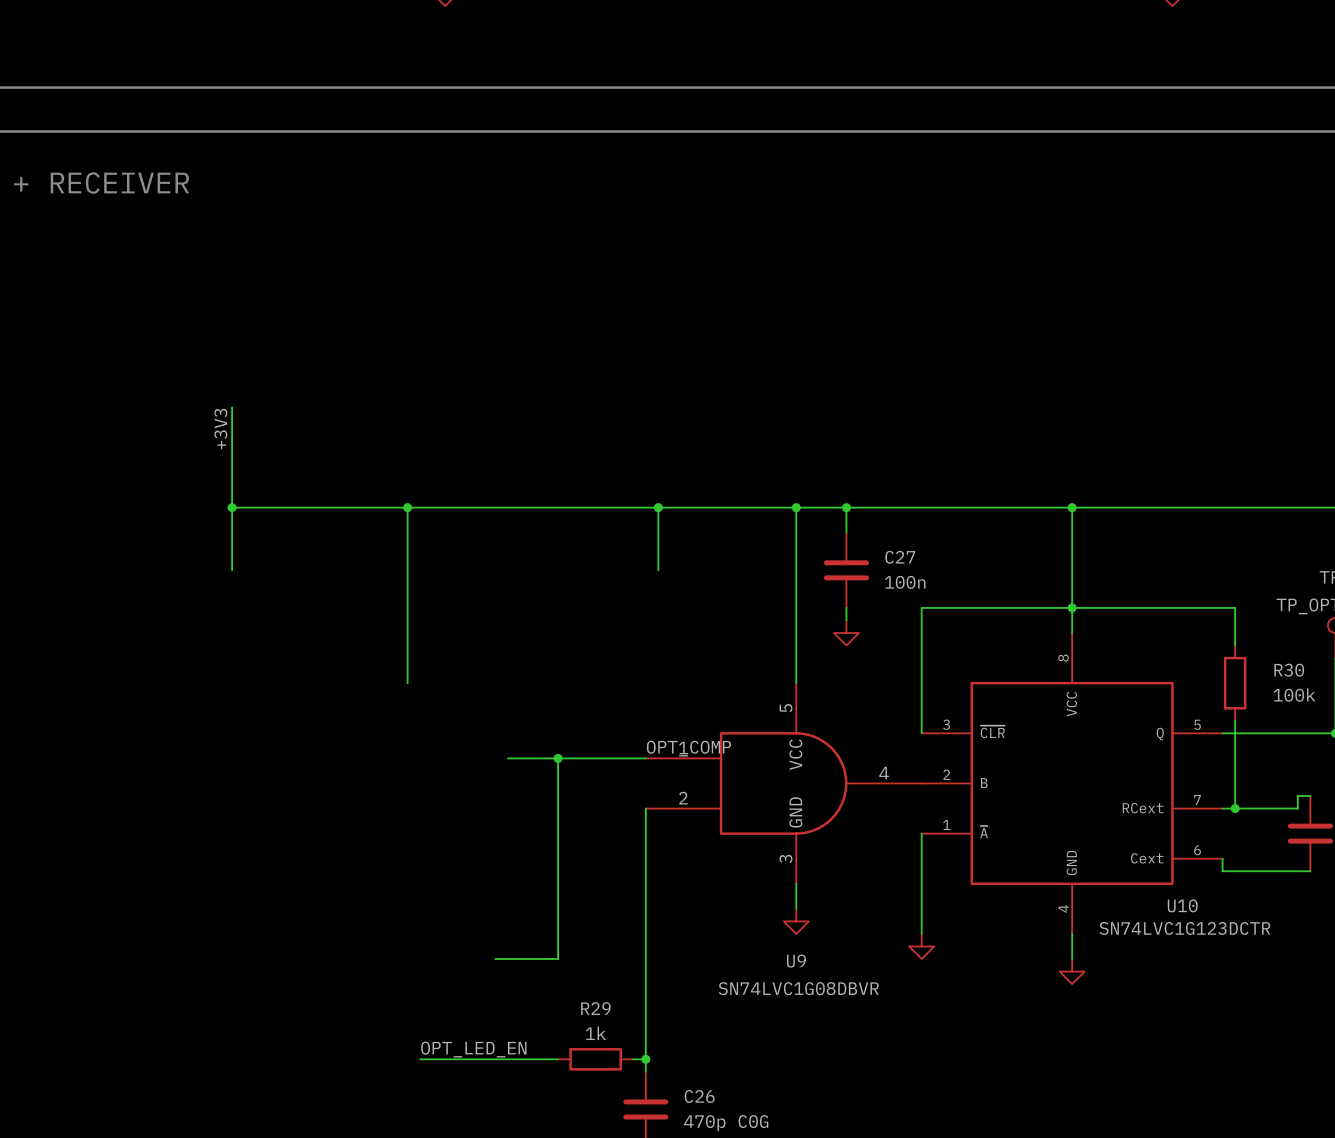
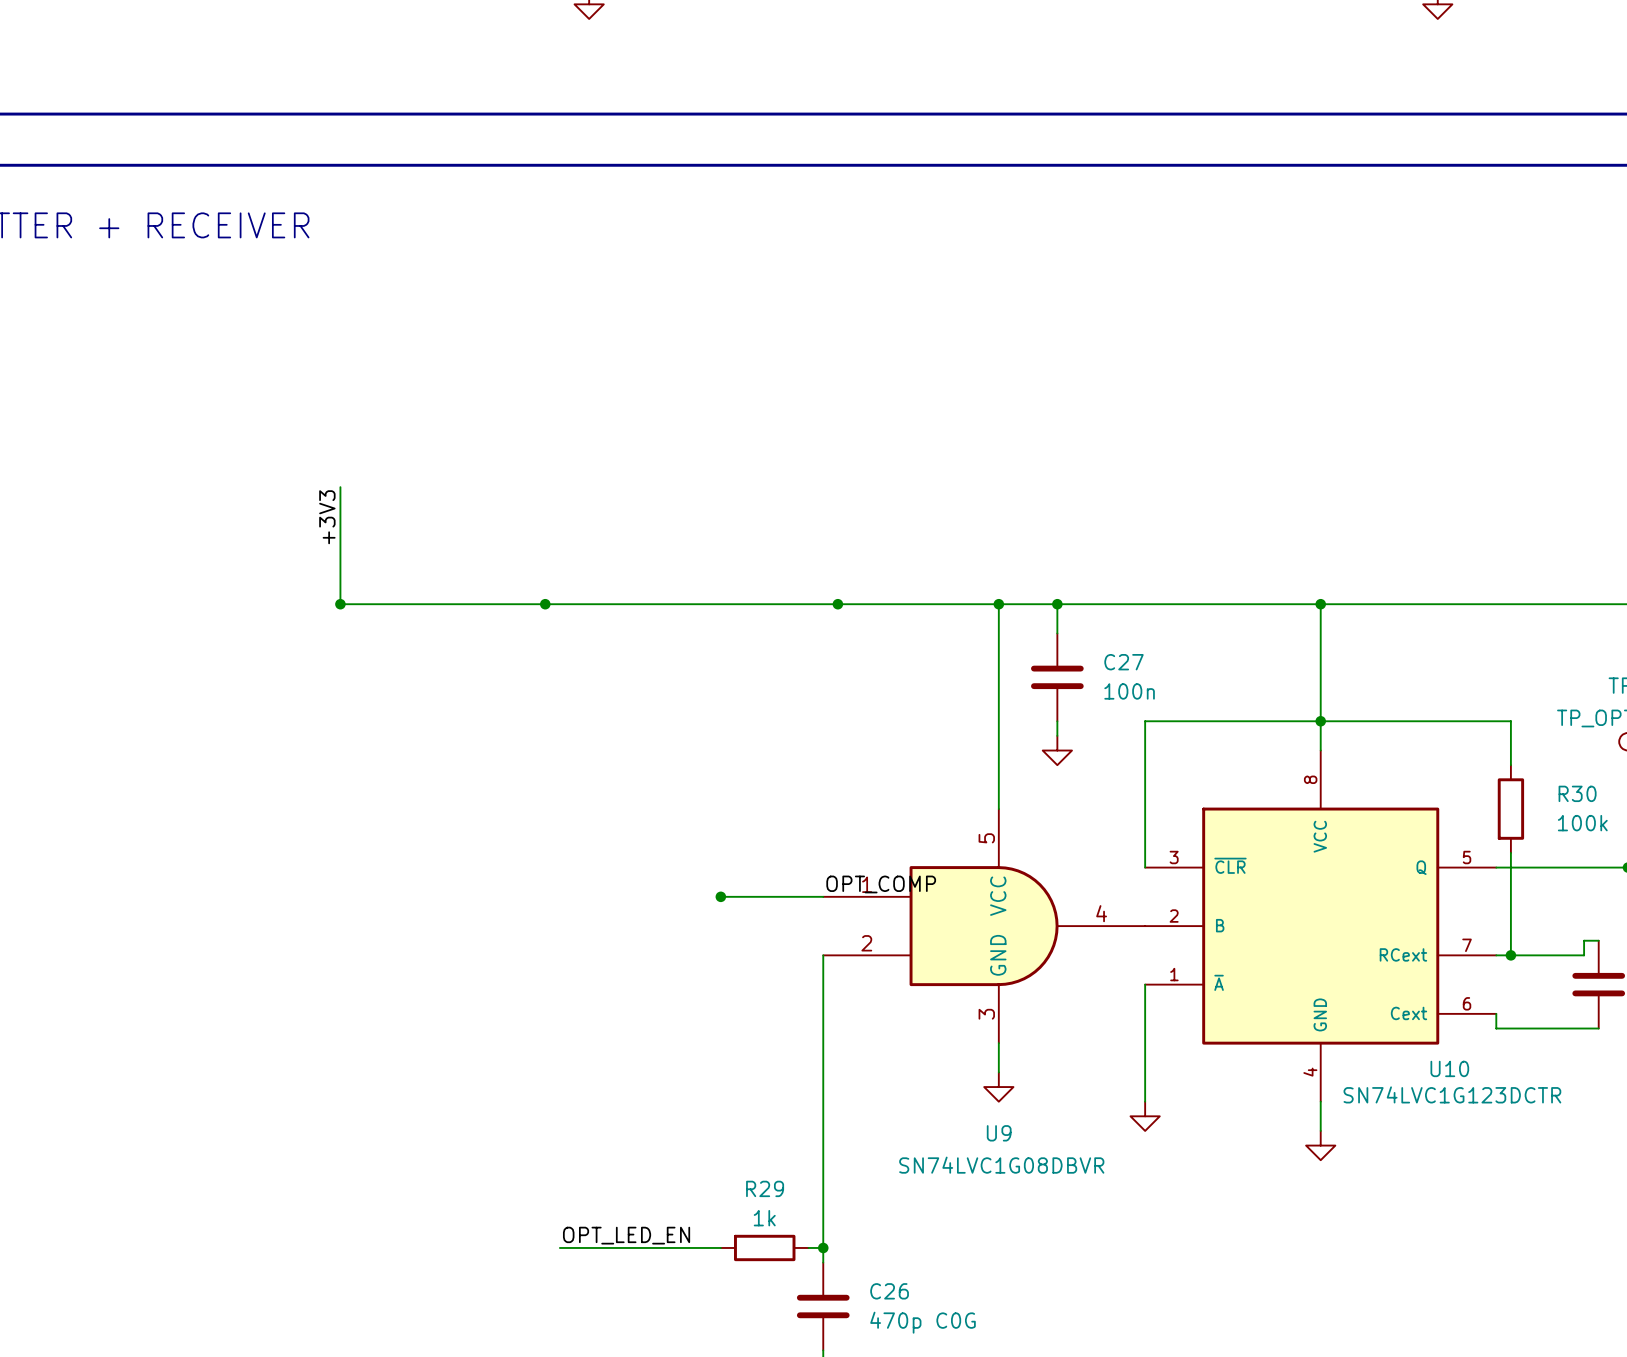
wire: (232, 507) (232, 570) -> none
wire: (407, 507) (407, 683) -> none
wire: (658, 507) (658, 570) -> none
wire: (507, 758) (558, 758) (558, 959) (495, 959) -> none

